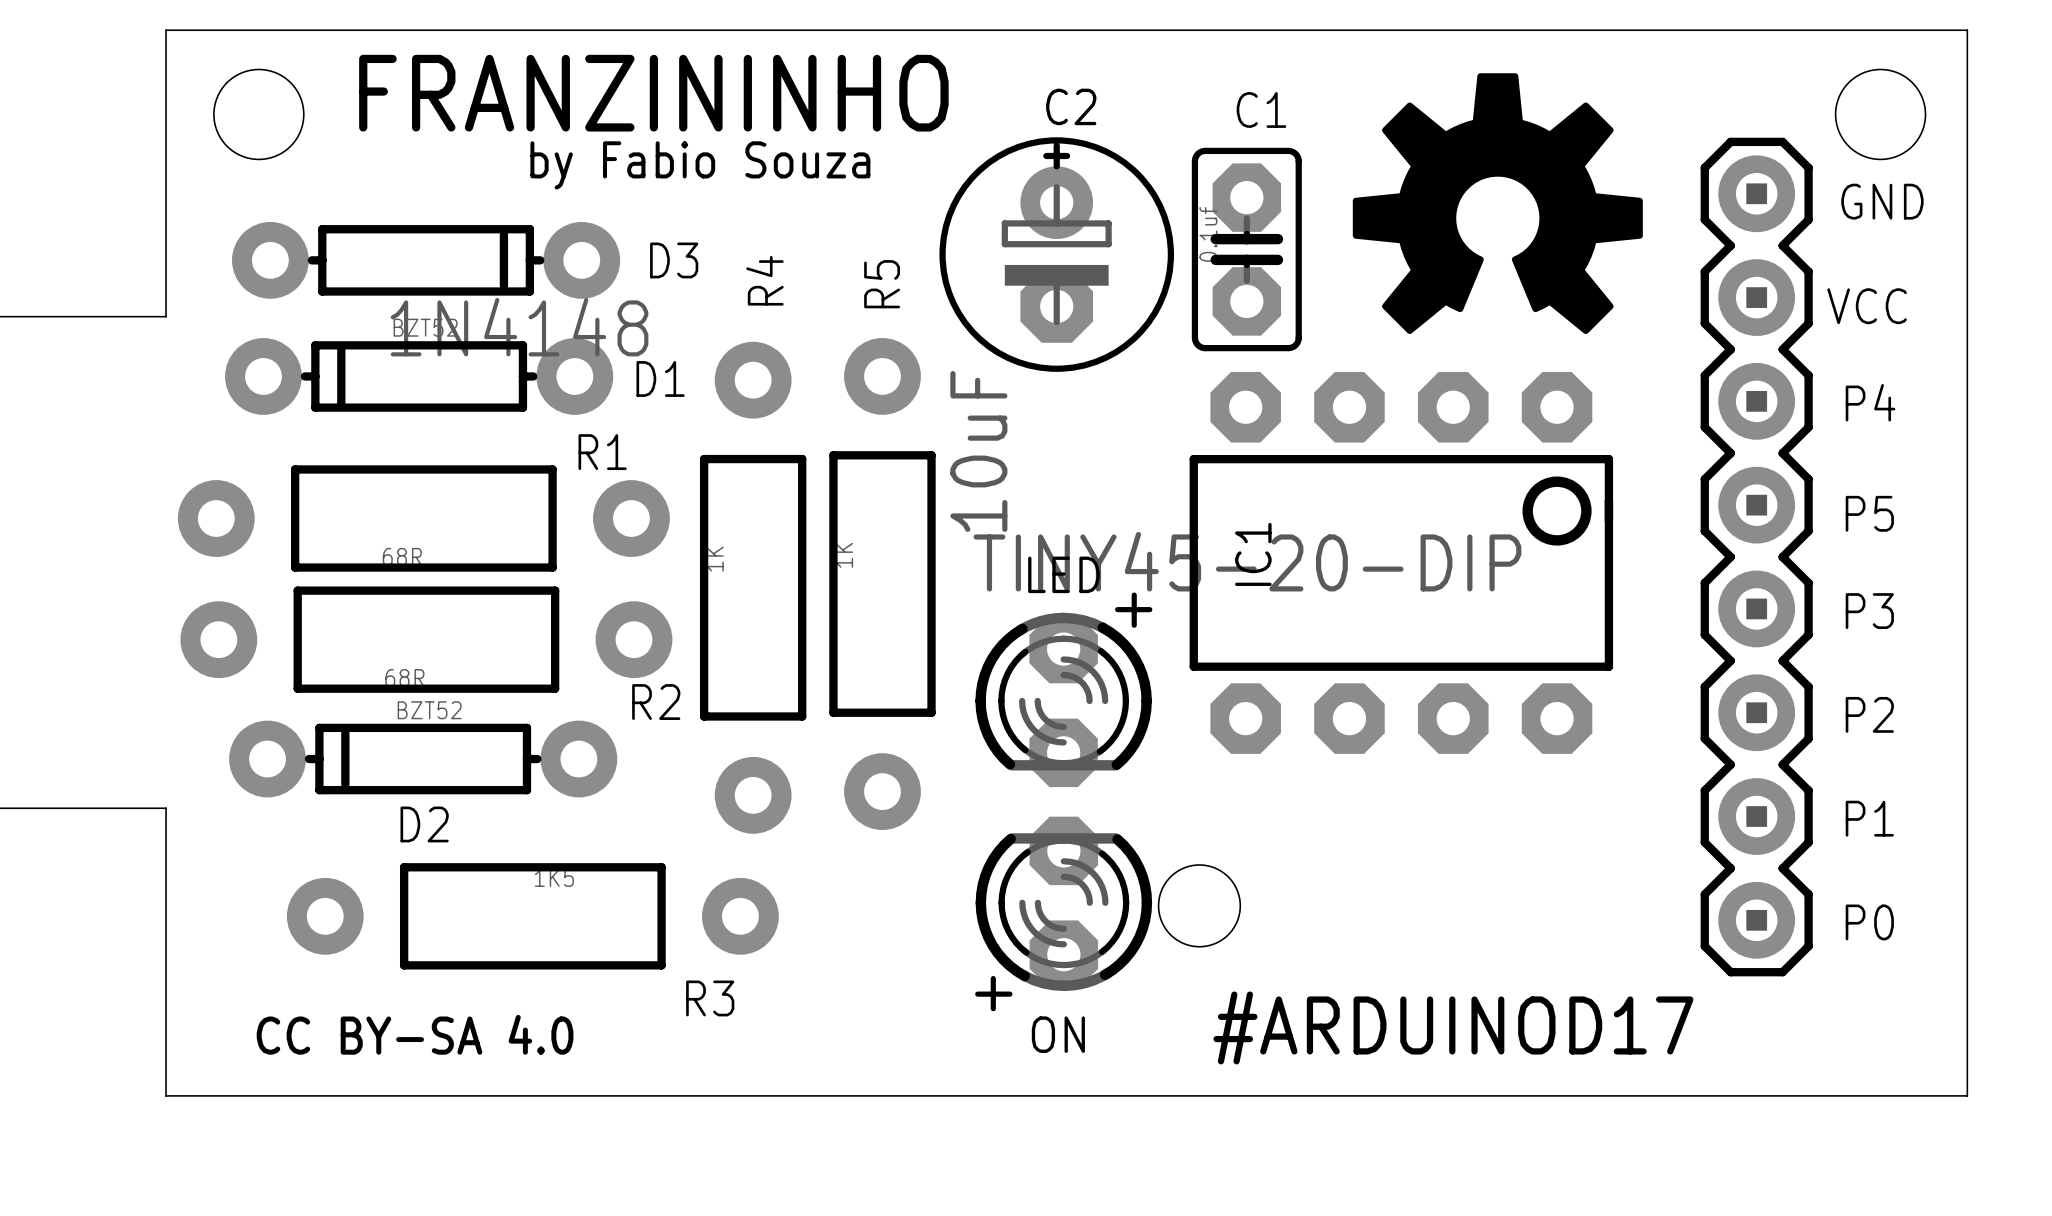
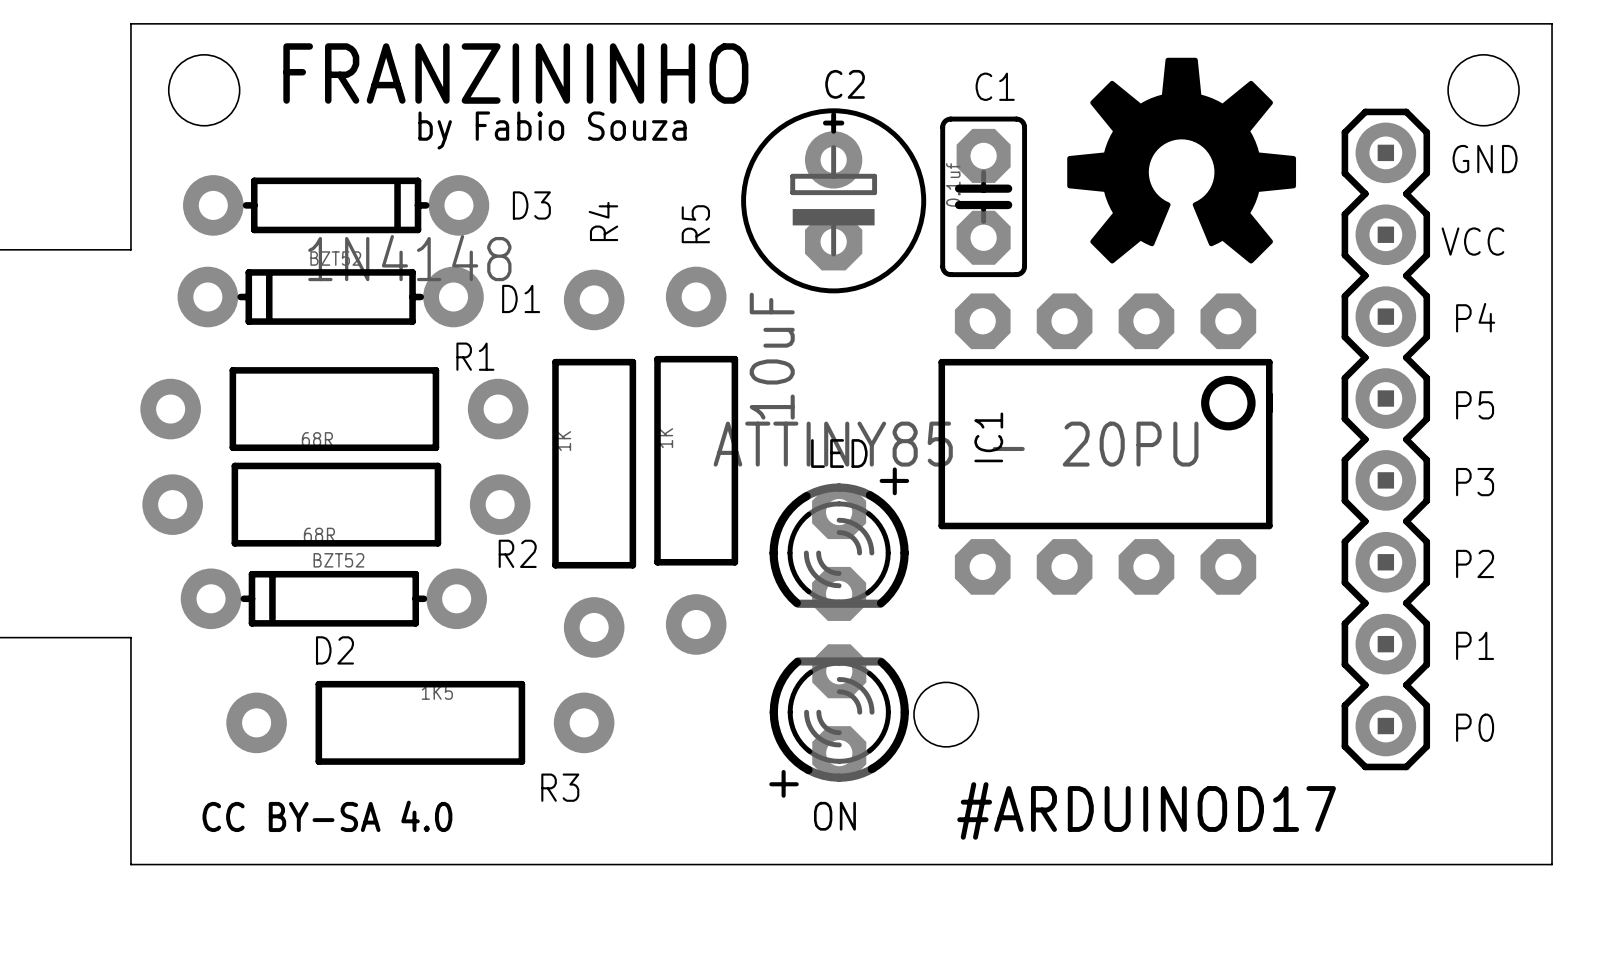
IC1 value: TINY45-20-DIP (1247, 561) -> ATTINY85 - 20PU (956, 444)

